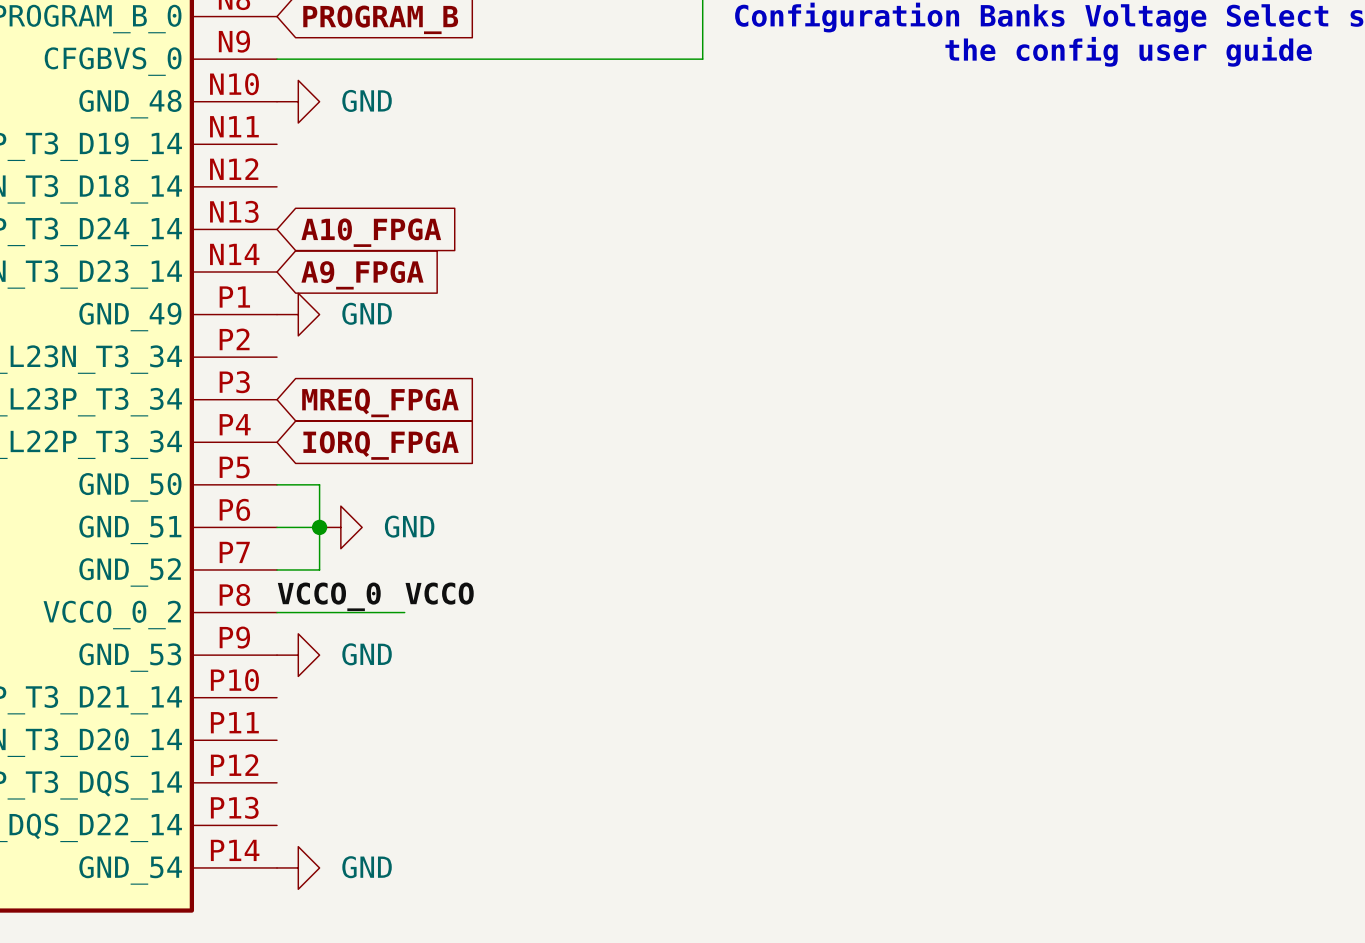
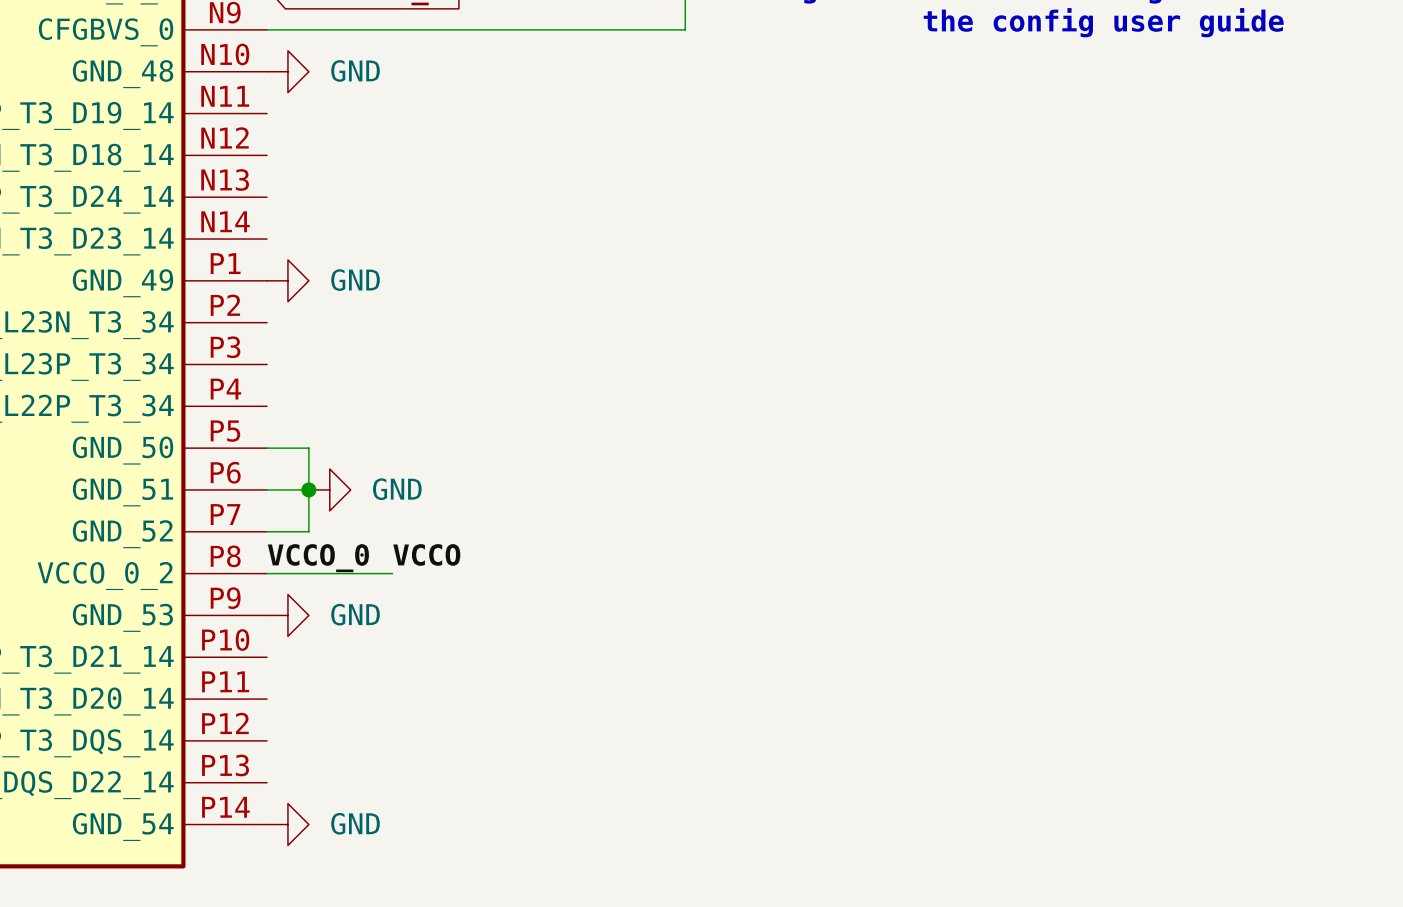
global label: A10_FPGA (371, 232) -> none
global label: A9_FPGA (362, 275) -> none
global label: MREQ_FPGA (380, 402) -> none
global label: IORQ_FPGA (381, 445) -> none

